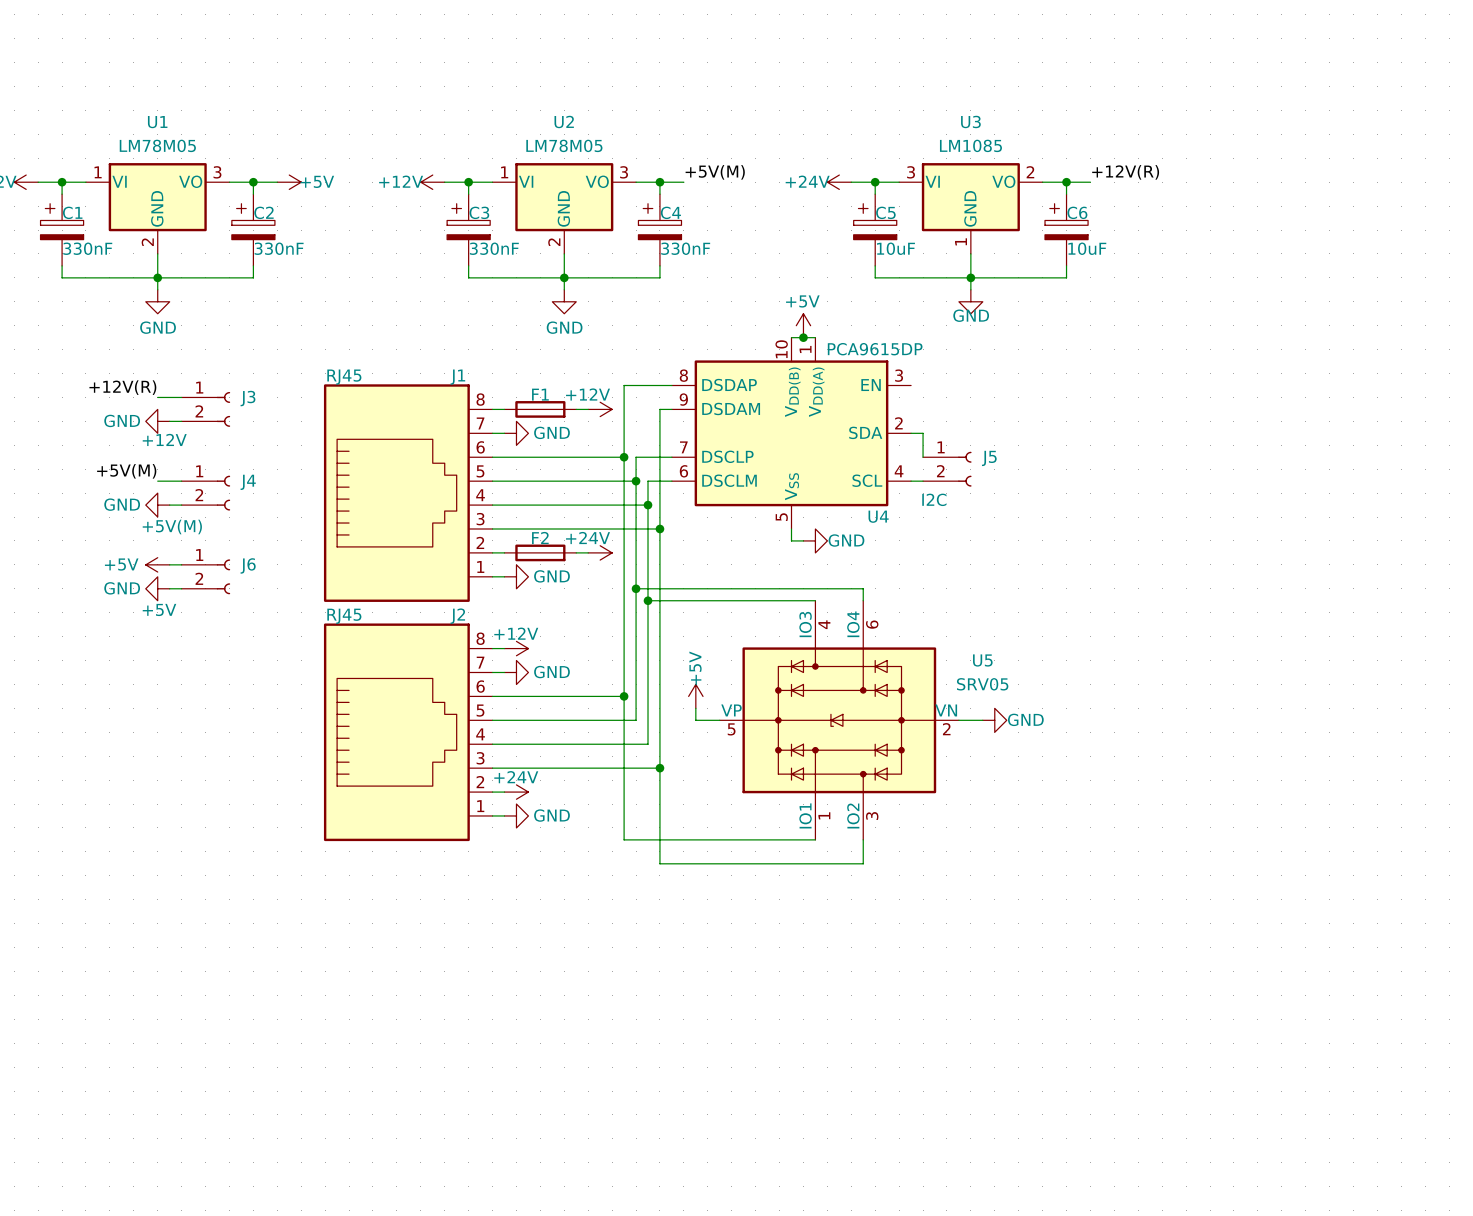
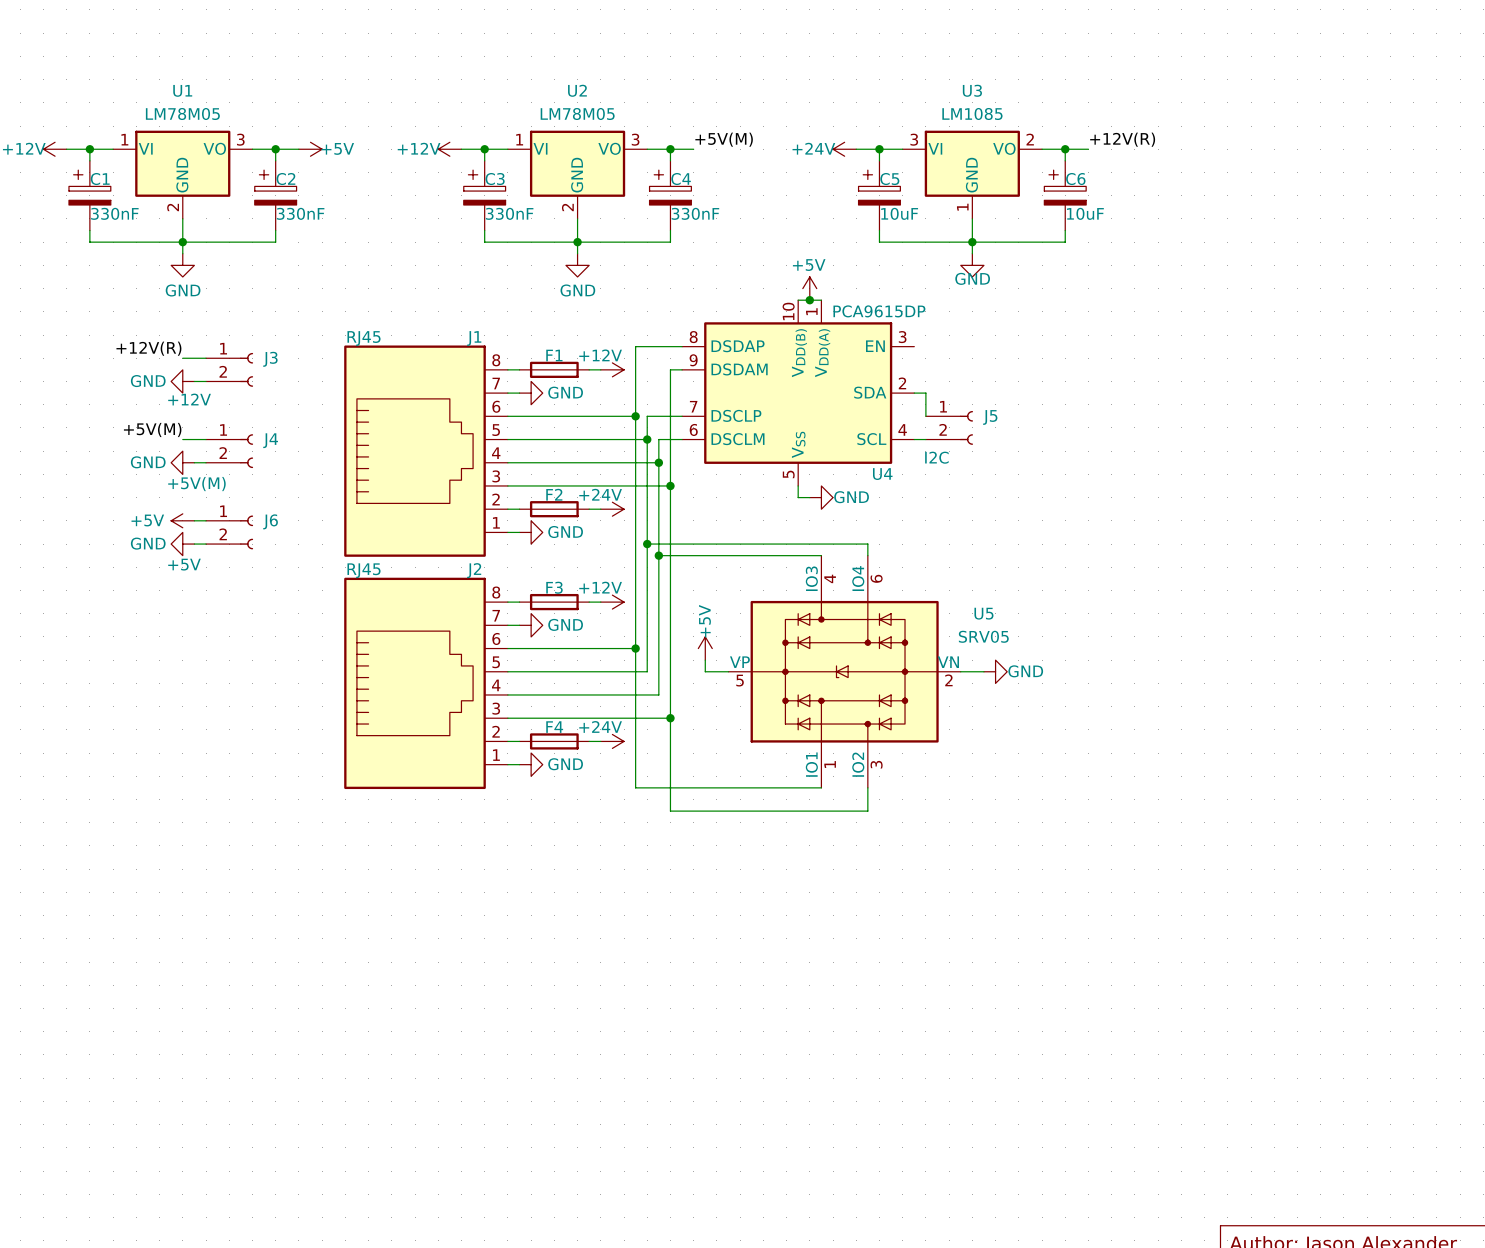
power symbol text position: +12V (516, 633) -> +12V (600, 587)
power symbol position: +12V (516, 648) -> +12V (612, 602)
F3: none -> (554, 602)
wire: none -> (589, 602) (600, 602)
power symbol text position: +24V (516, 777) -> +24V (600, 726)
power symbol position: +24V (516, 792) -> +24V (612, 741)
F4: none -> (554, 741)
wire: none -> (589, 741) (600, 741)

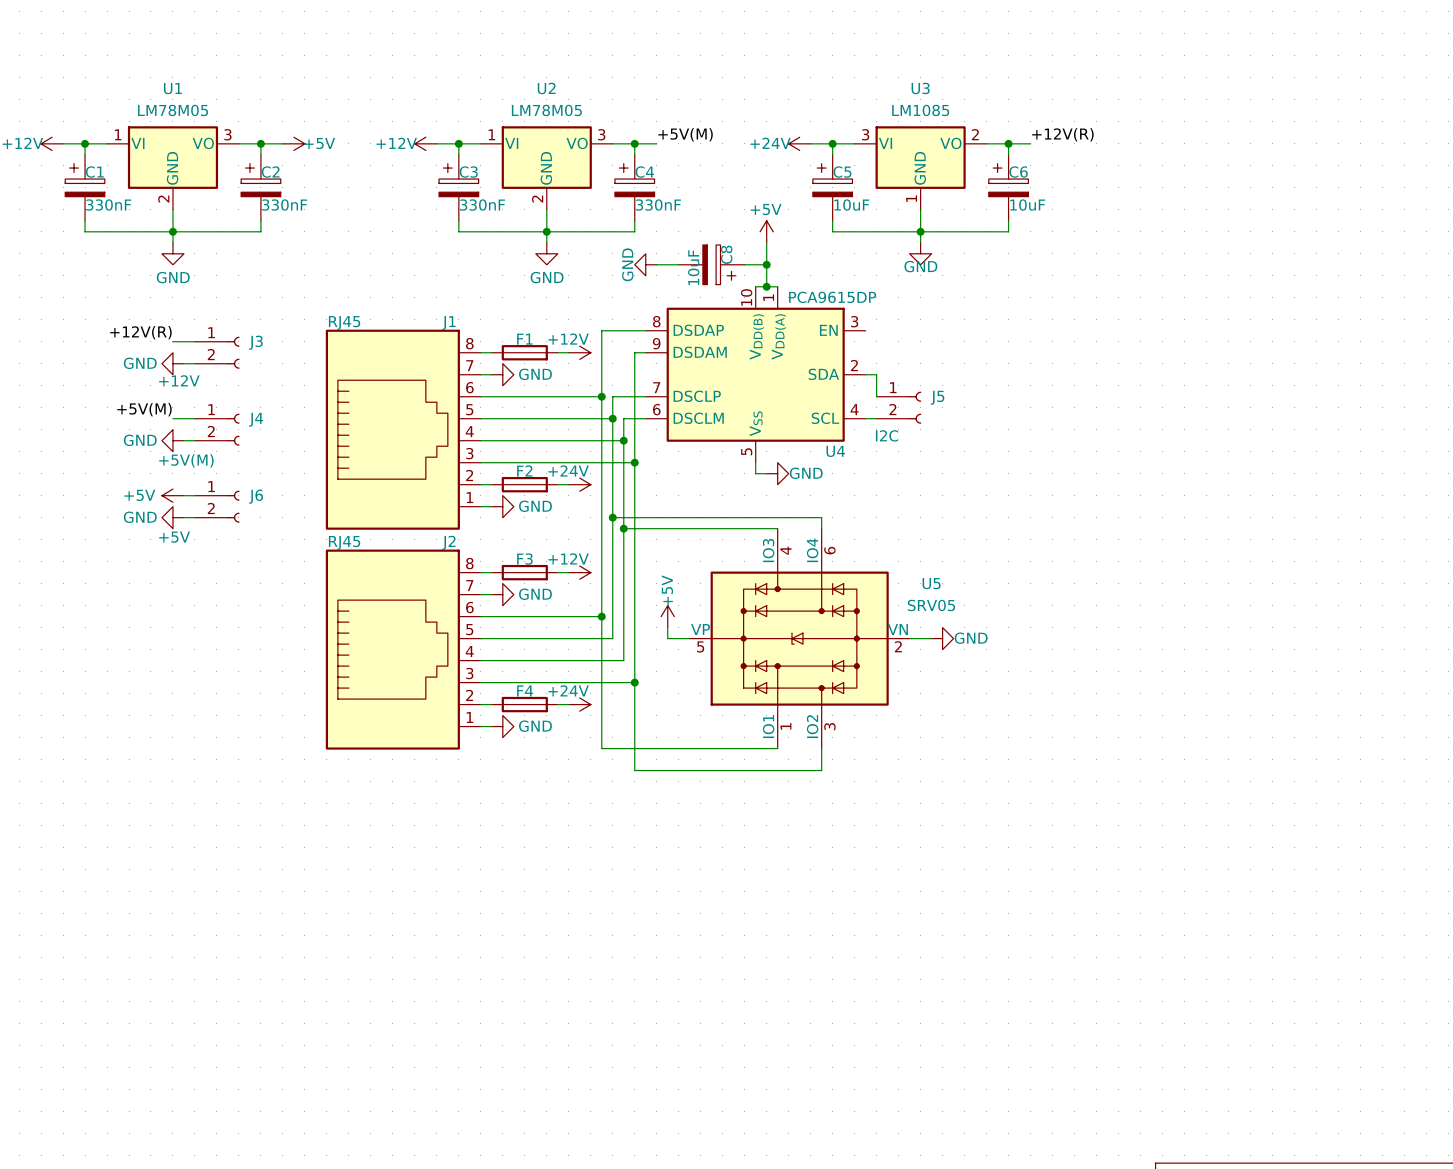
power symbol: none -> GND (645, 264)
wire: none -> (656, 264) (678, 264)
C8: none -> 10uF (711, 264)
wire: none -> (744, 264) (766, 264)
junction: none -> (766, 264)
power symbol position: +5V (809, 288) -> +5V (766, 231)

